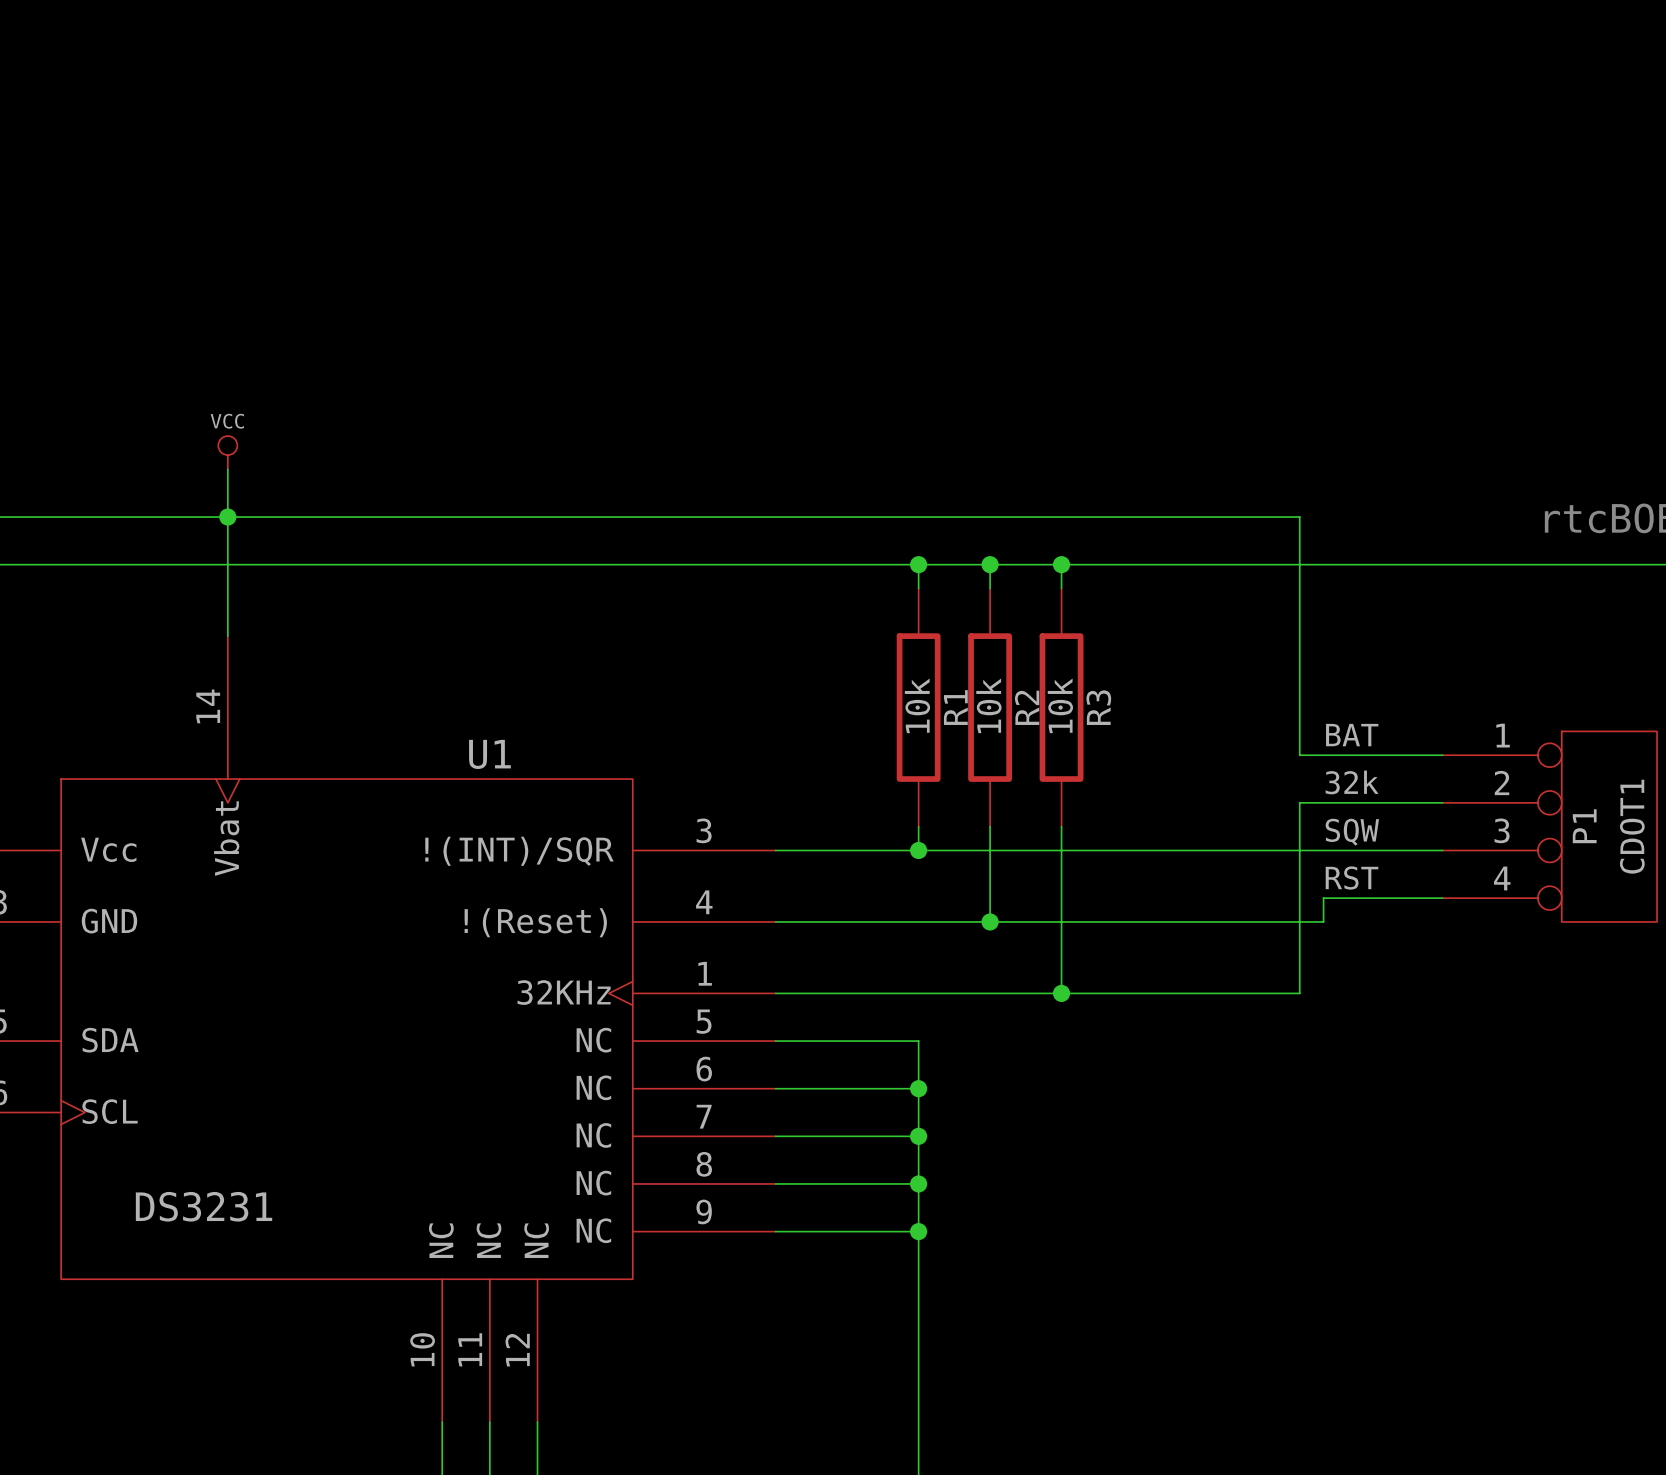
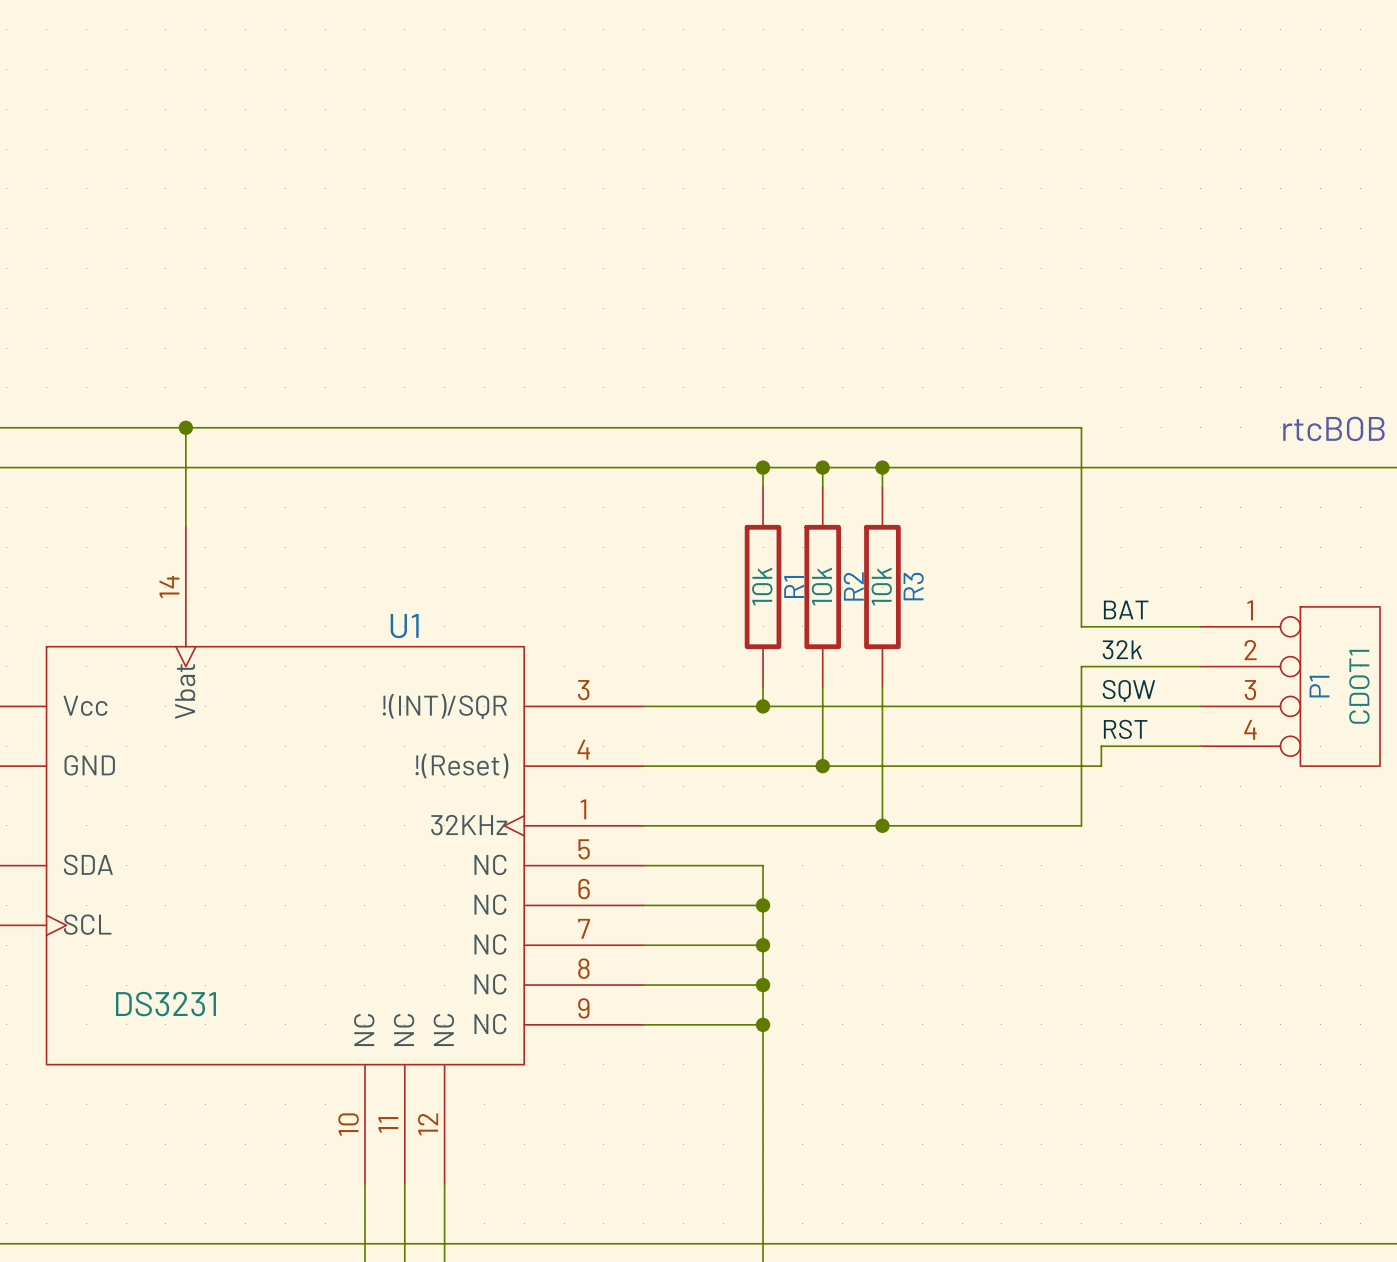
power symbol: VCC (227, 452) -> none
wire: (227, 469) (227, 517) -> none

